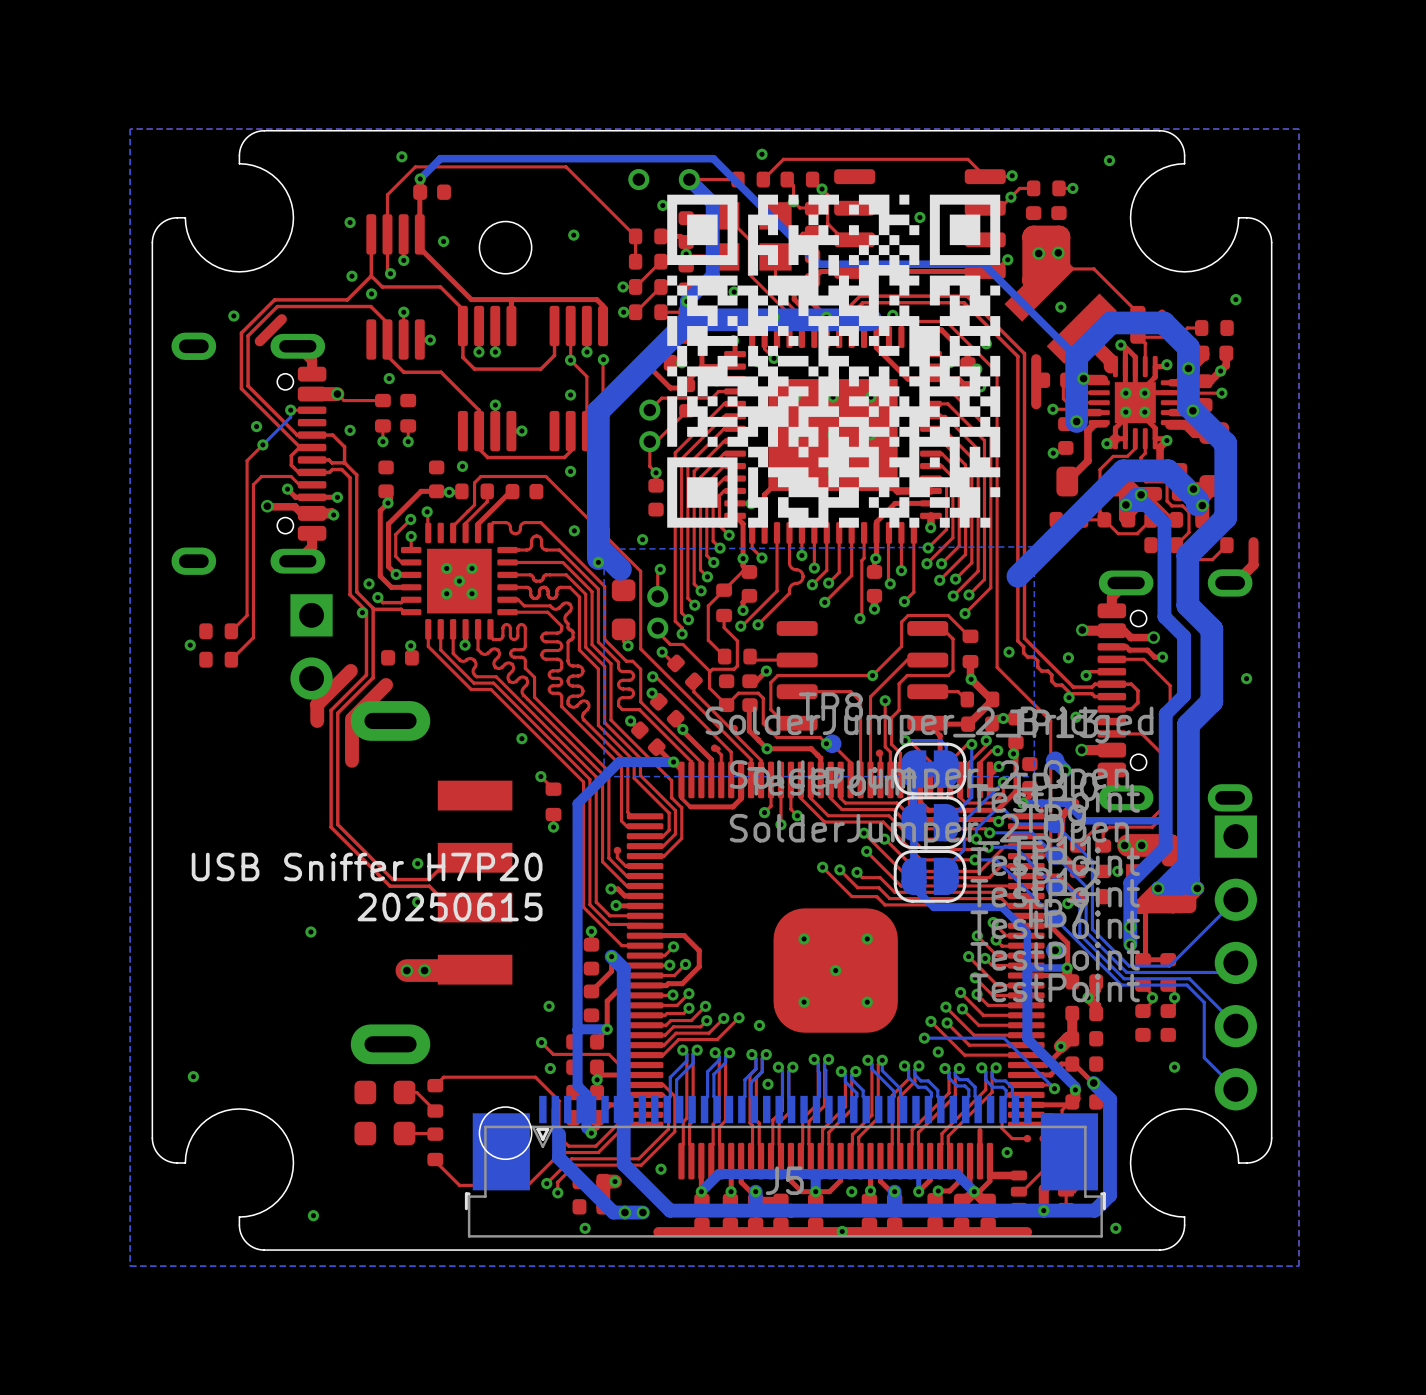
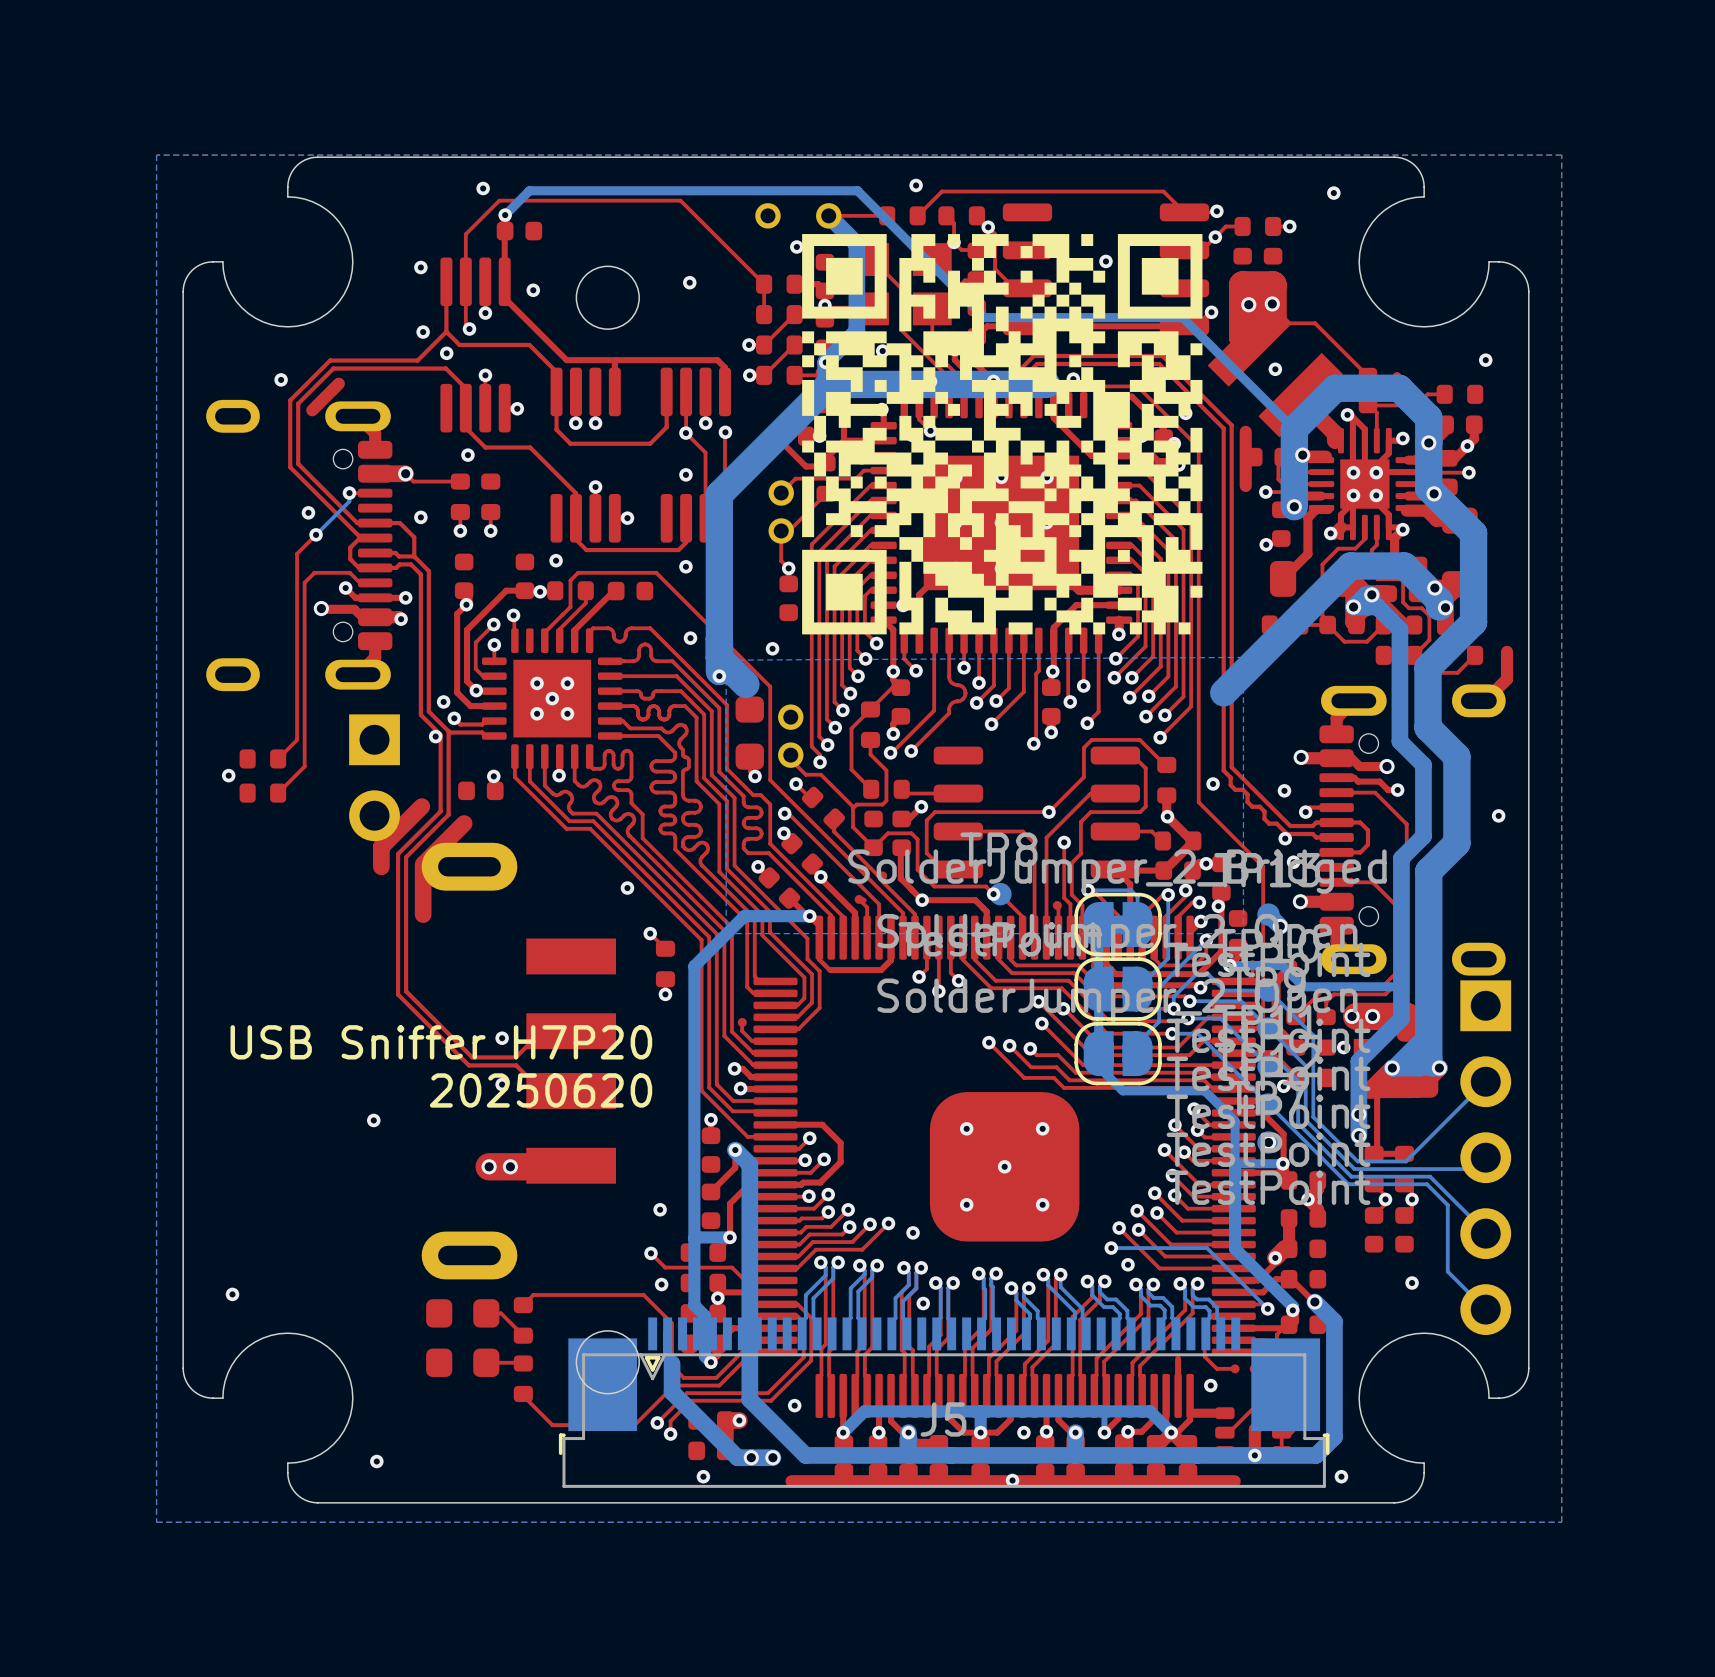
top track: (660, 569) (657, 571) (657, 596) -> none
via: (660, 569) -> none
text: 20250615 (450, 907) -> 20250620 (541, 1090)

